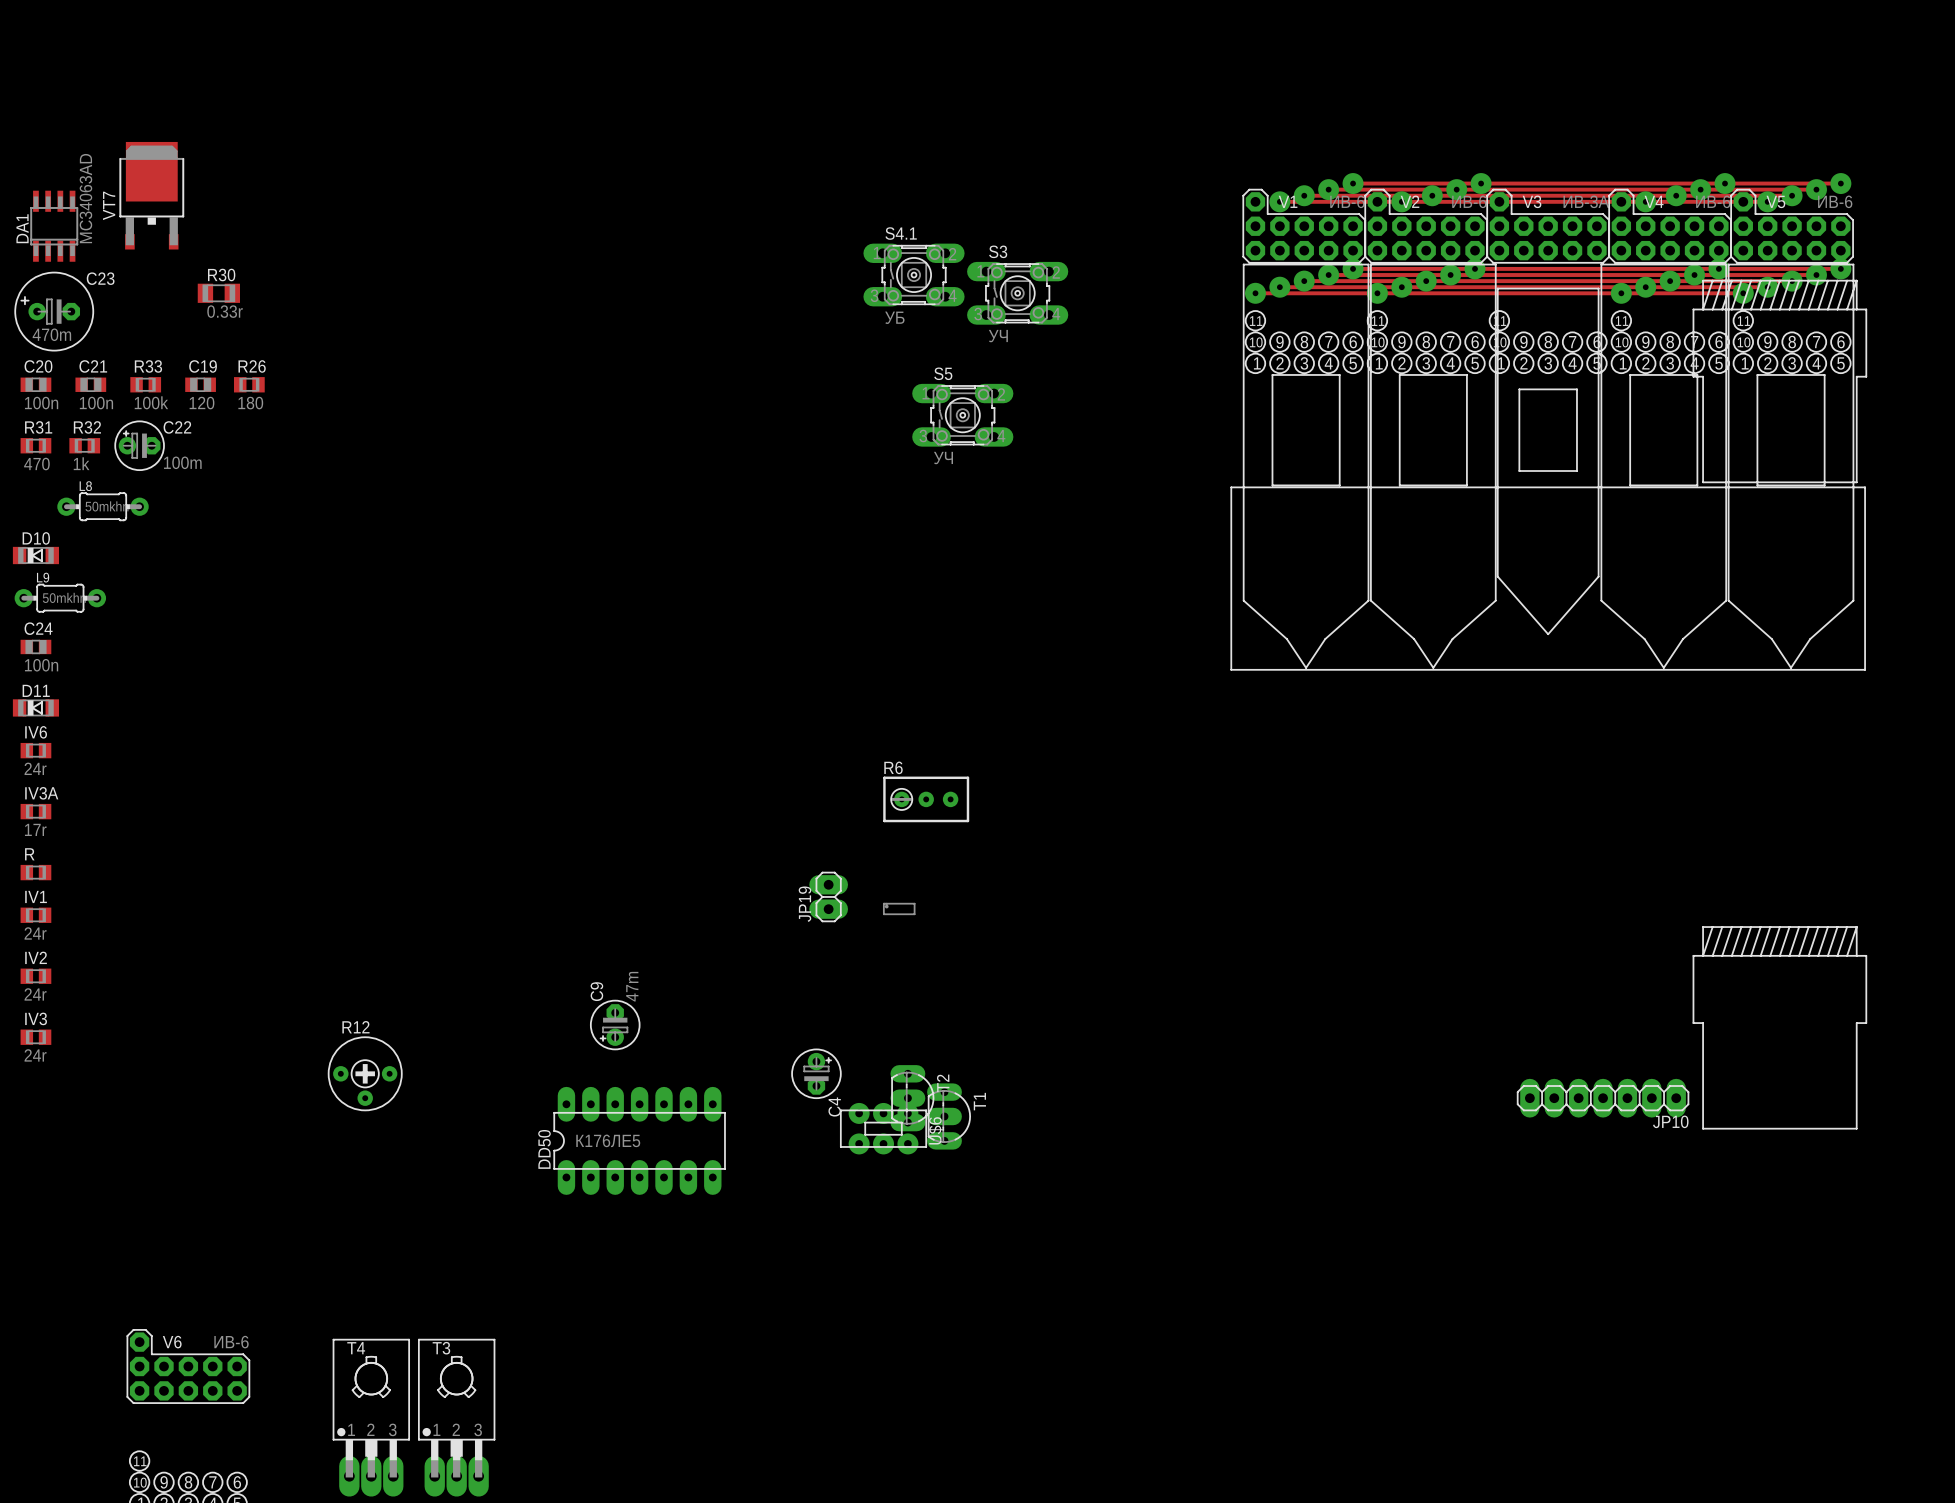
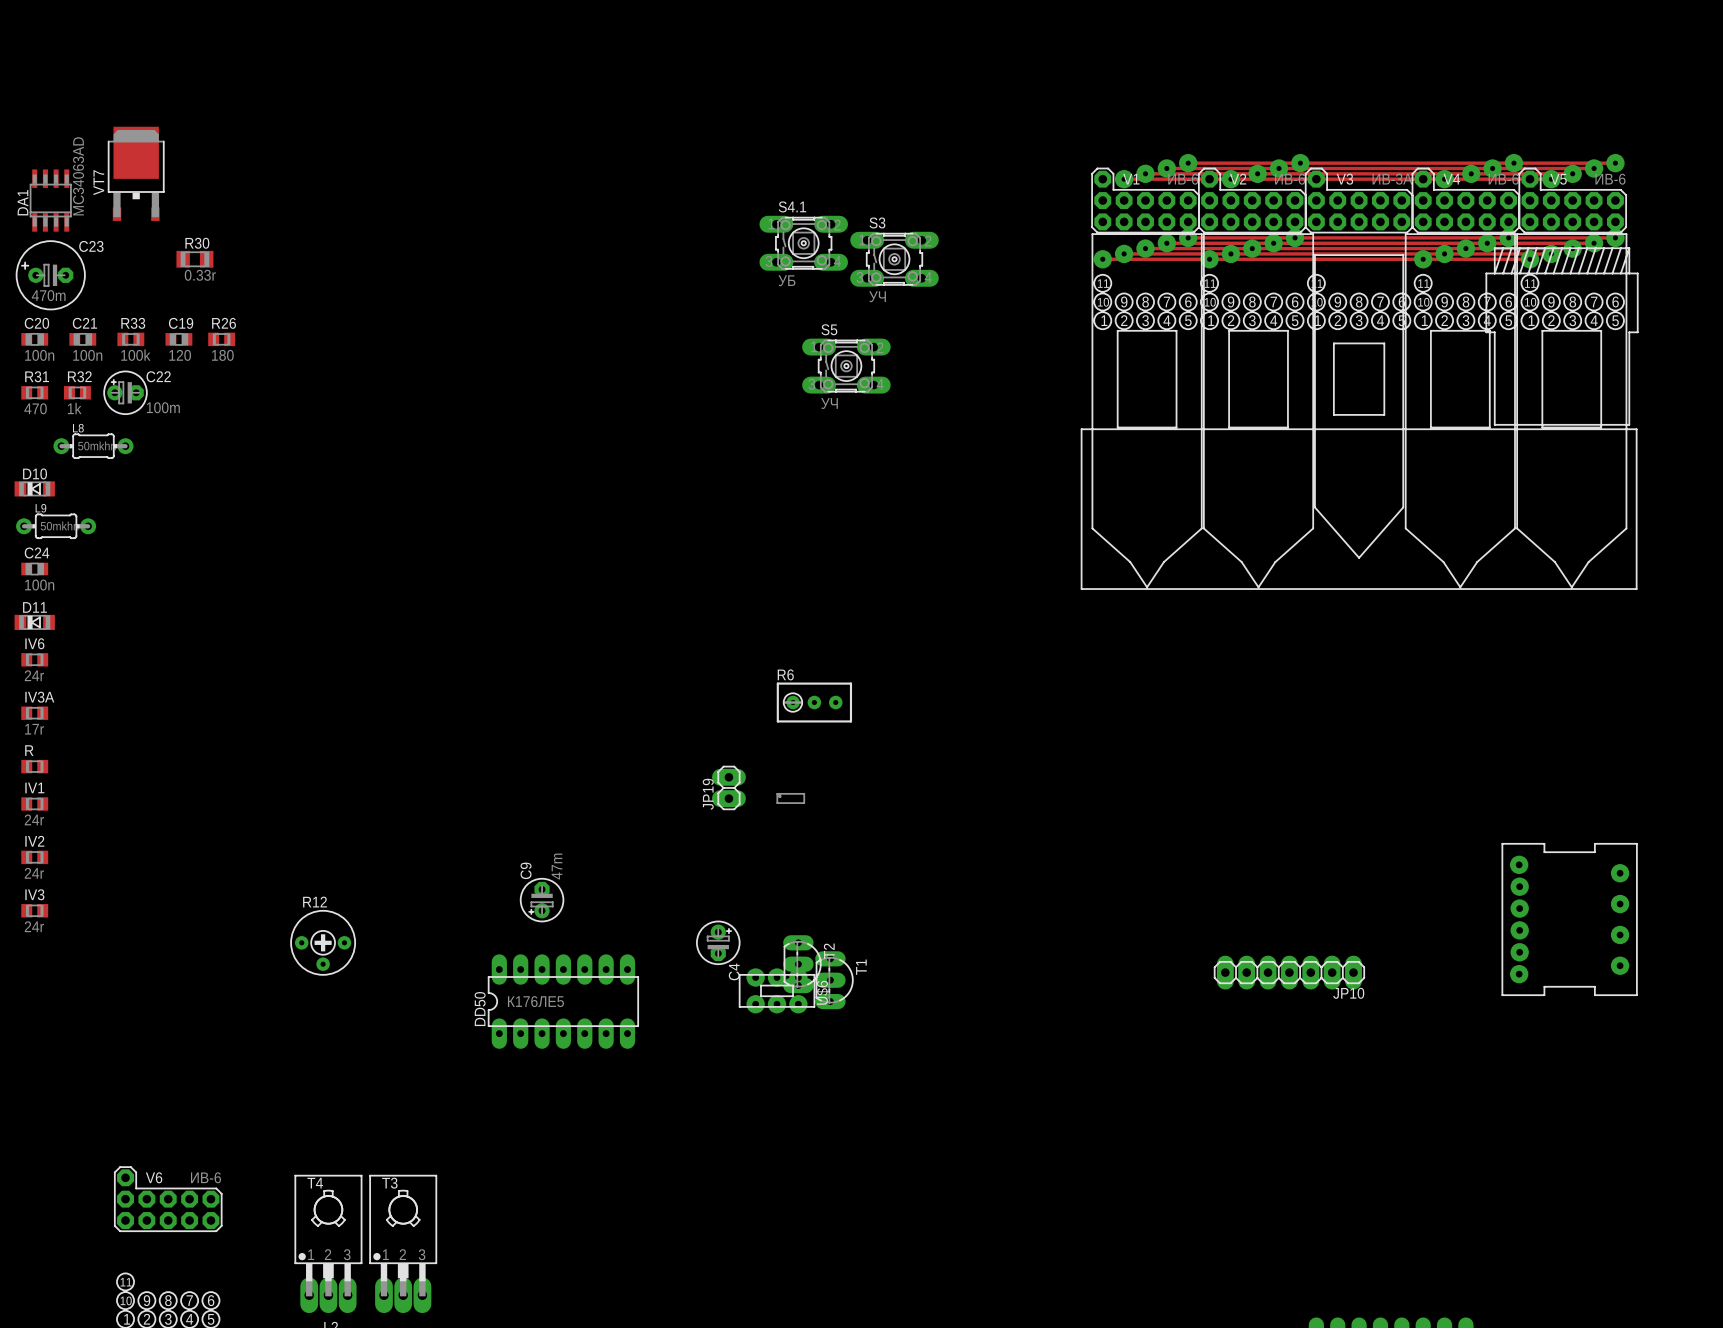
drawing: [1692, 926, 1867, 1130] -> none
part: none -> (1569, 919)
JP10 position: (1603, 1098) -> (1289, 972)

